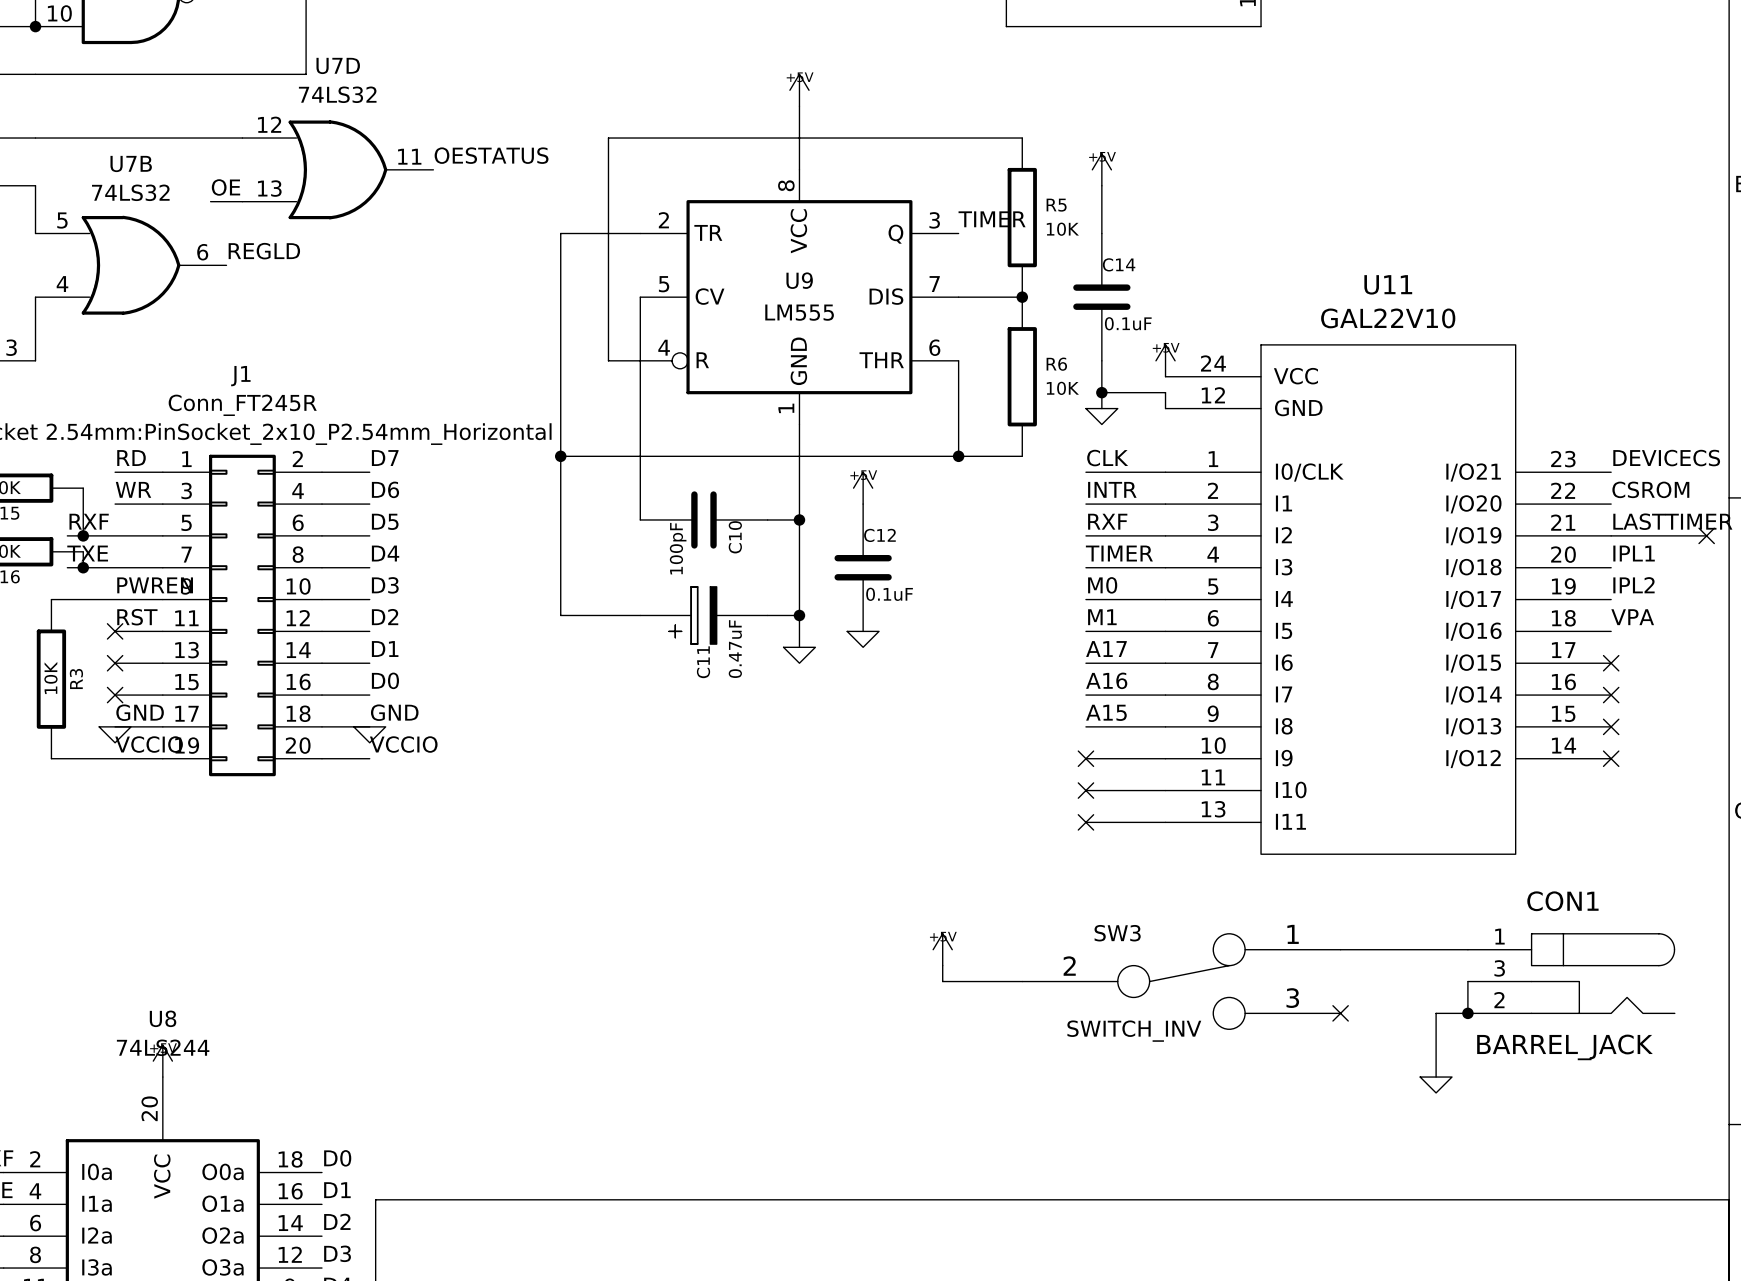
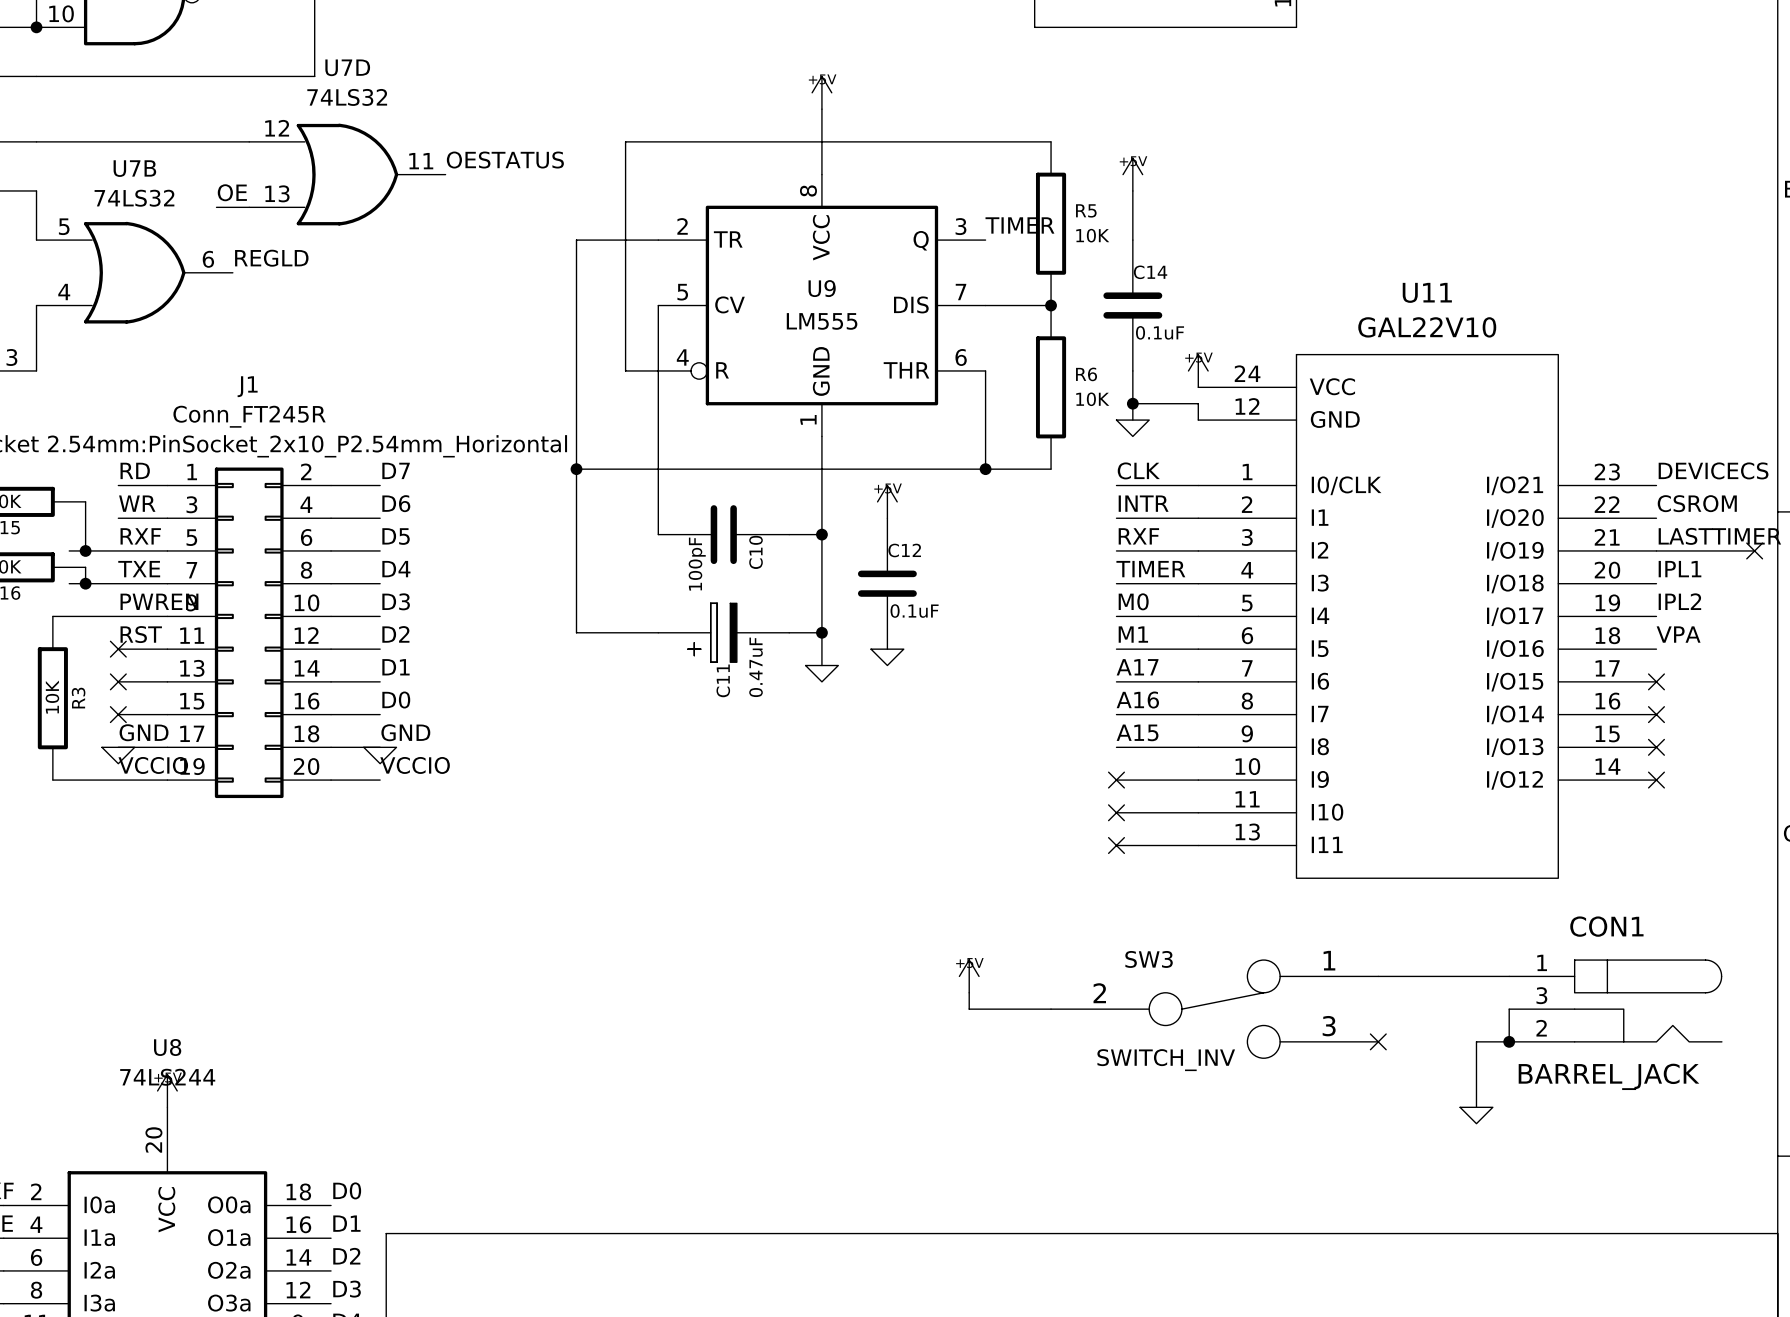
label position: RXF (89, 521) -> RXF (140, 536)
label position: TXE (87, 553) -> TXE (139, 569)

